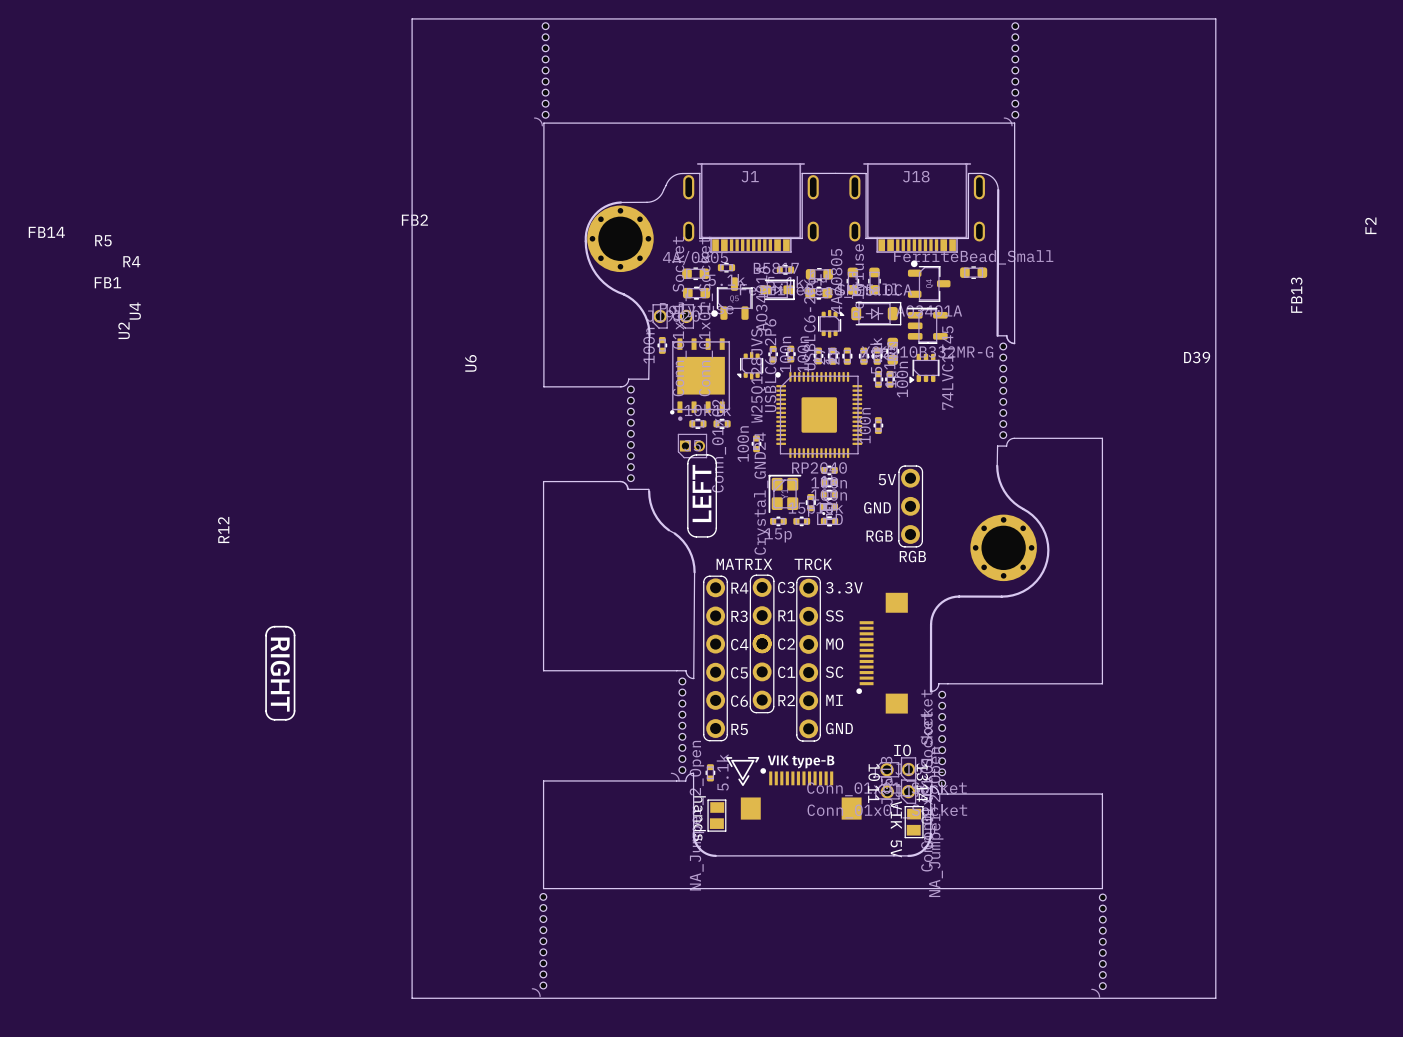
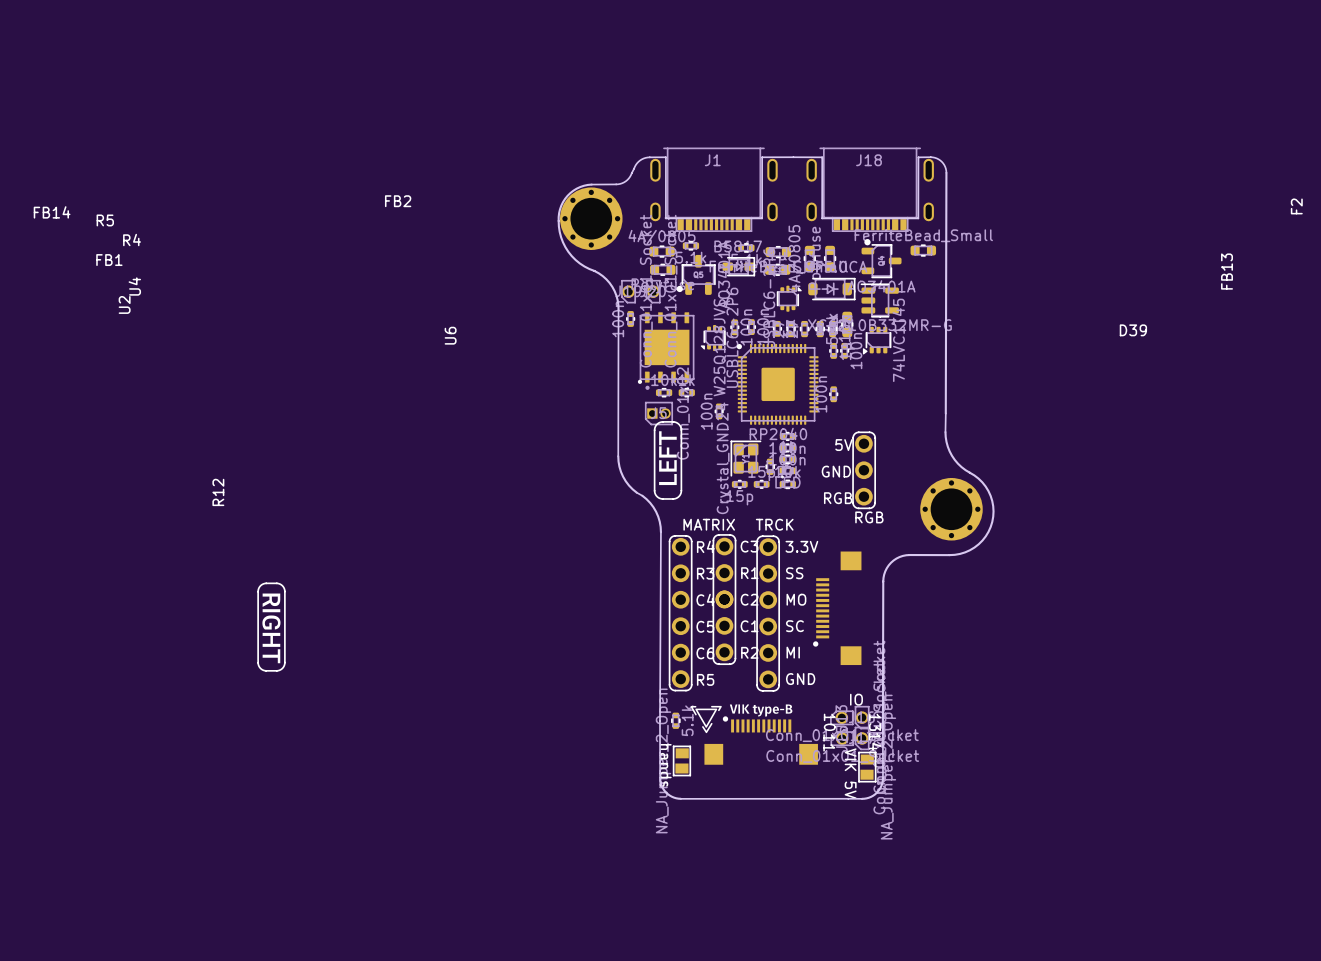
board edge: (412, 18) (1215, 18) (1215, 998) (412, 998) (412, 18) -> none
part: (541, 74) -> none
part: (1011, 74) -> none
board edge: (998, 190) (997, 335) (1006, 335) (1009, 341) (1014, 343) (1014, 123) (543, 123) (543, 386) (621, 386) (627, 383) (628, 379) -> (946, 172) (945, 413)
board edge: (649, 335) (648, 379) (628, 379) -> (618, 310) (618, 456)
part: (1007, 386) -> none
part: (626, 437) -> none
board edge: (997, 446) (1006, 446) (1008, 441) (1013, 438) (1102, 438) (1102, 683) (938, 683) (936, 689) (931, 691) (931, 624) -> none
board edge: (649, 491) (648, 489) (628, 489) (625, 483) (621, 481) (543, 481) (543, 670) (686, 670) (688, 676) (693, 678) -> none
board edge: (694, 572) (693, 678) -> (660, 532) (659, 721)
part: (678, 729) -> none
part: (938, 743) -> none
board edge: (693, 773) (688, 775) (685, 781) (543, 780) (543, 888) (1102, 888) (1102, 794) (938, 793) (936, 788) (930, 786) -> (883, 581) (882, 733)
part: (539, 945) -> none
part: (1098, 945) -> none

